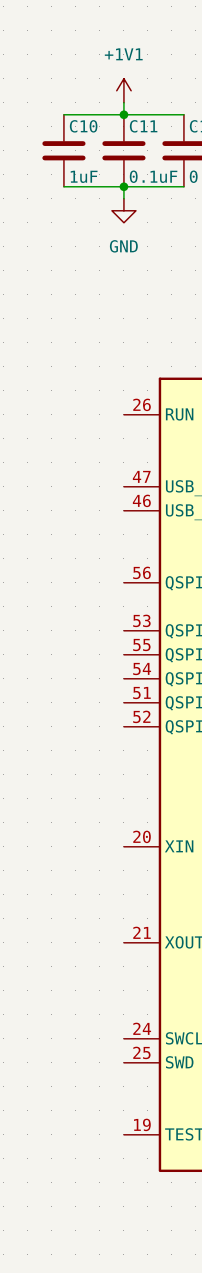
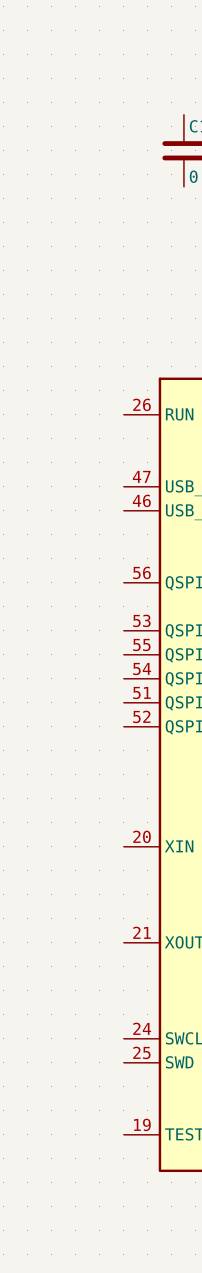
power symbol: +1V1 (123, 90) -> none
wire: (123, 102) (123, 114) -> none
wire: (63, 114) (183, 114) -> none
junction: (123, 114) -> none
C10: 1uF (63, 150) -> none
C11: 0.1uF (123, 150) -> none
wire: (63, 186) (183, 186) -> none
wire: (123, 186) (123, 198) -> none
junction: (123, 186) -> none
power symbol: GND (123, 210) -> none

